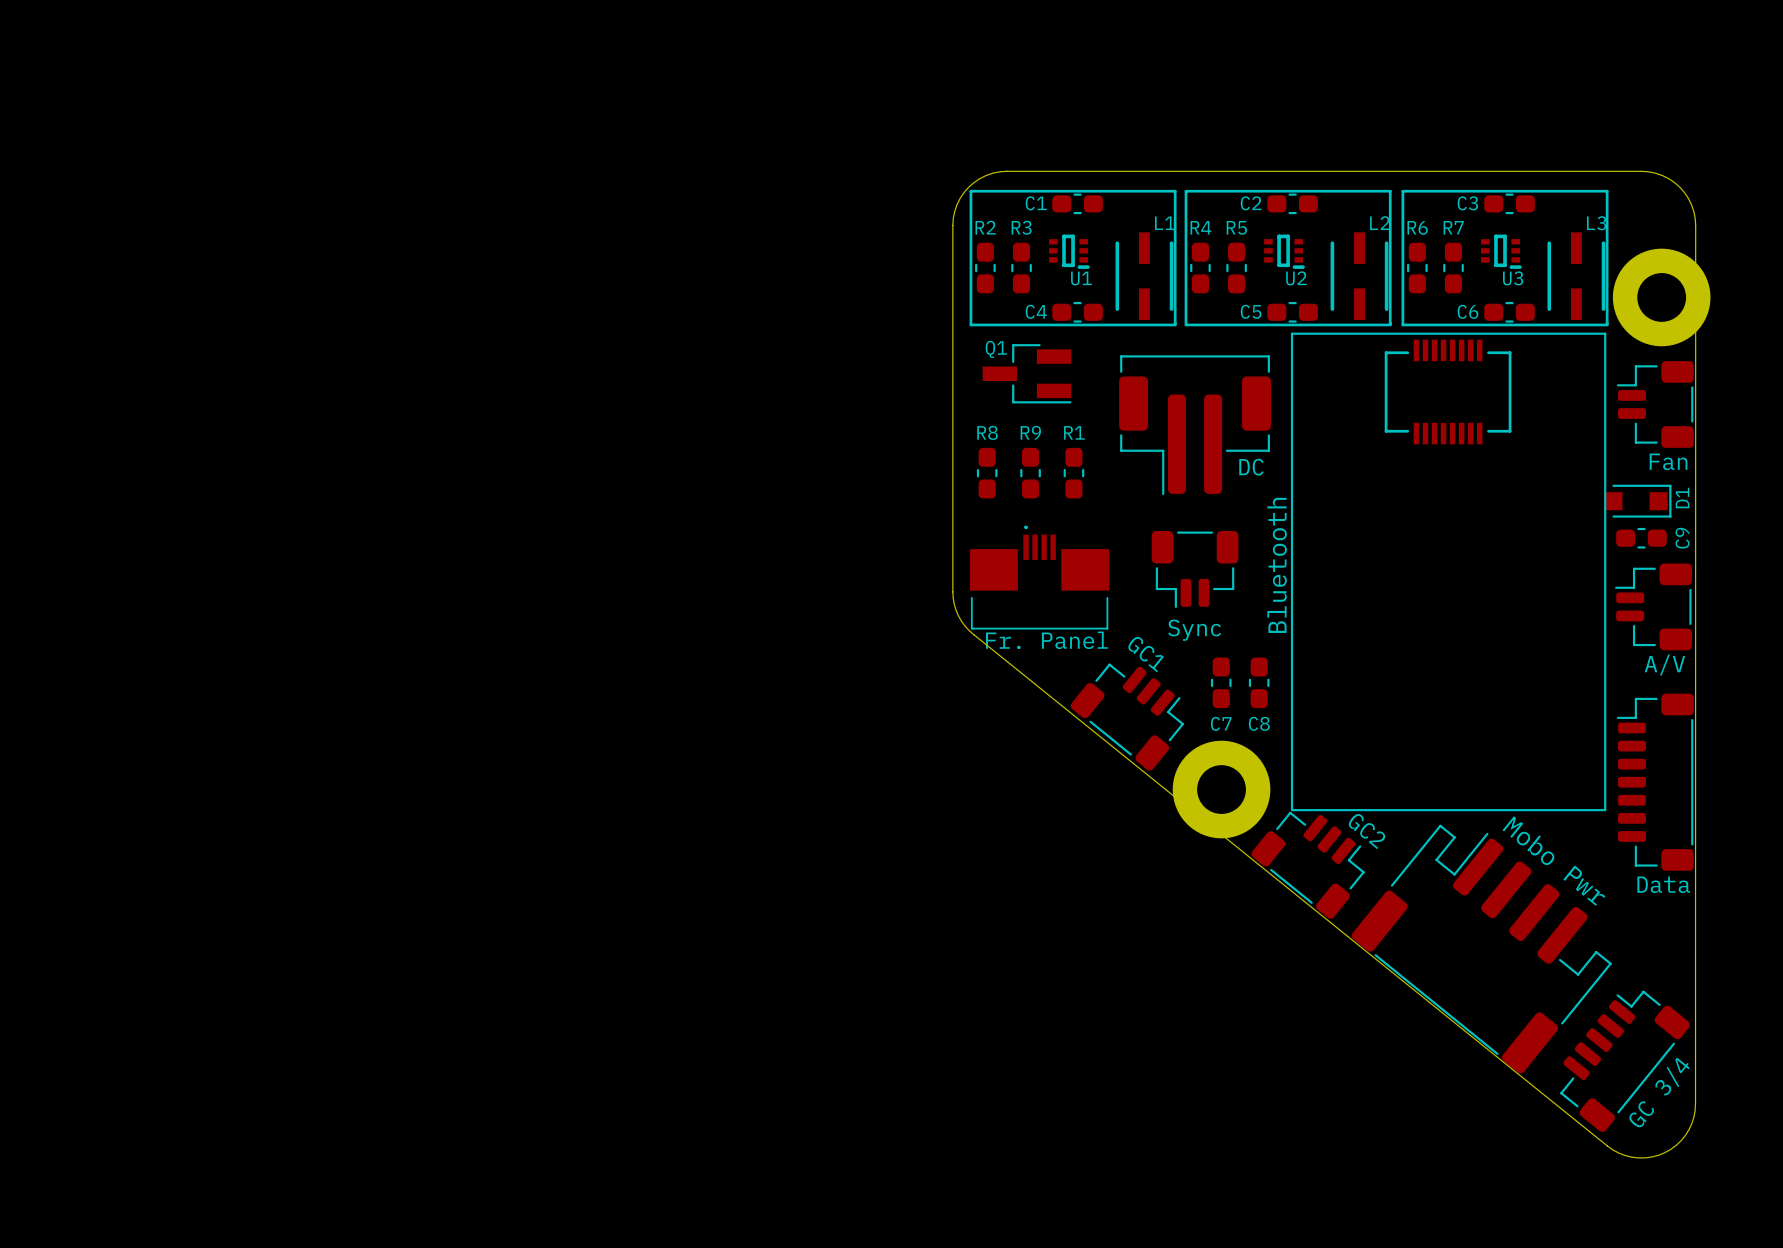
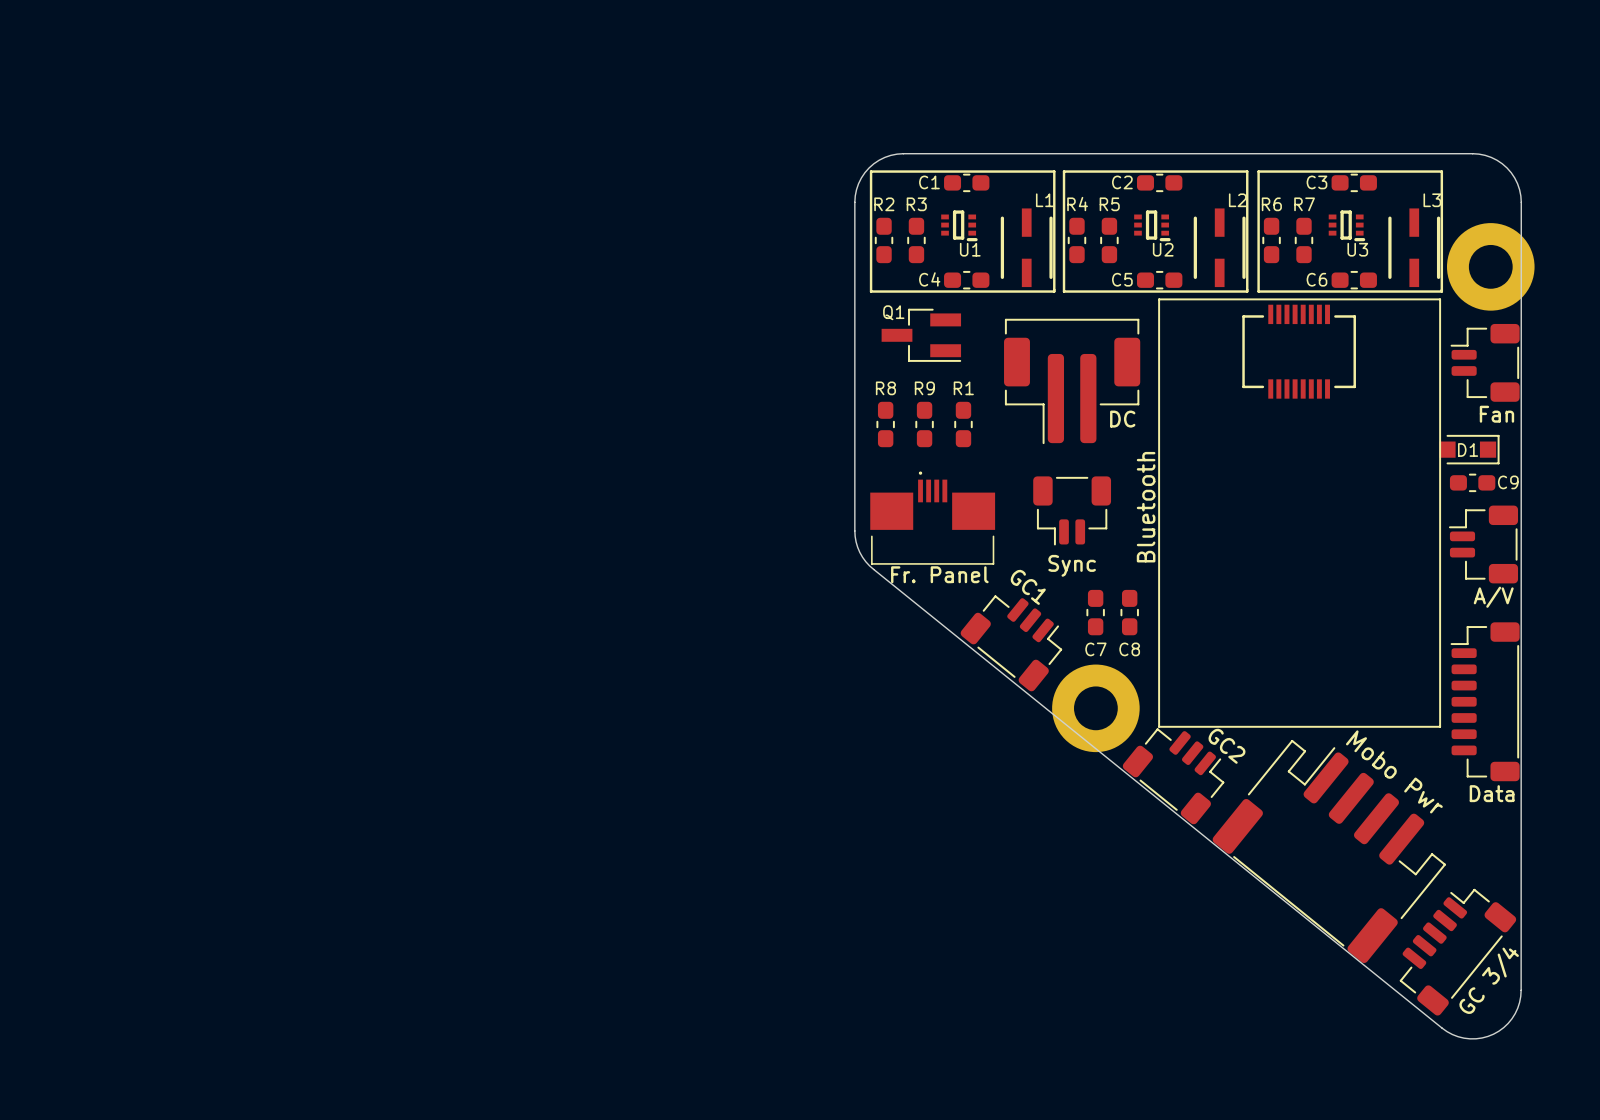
D1 name rotation: 0° (1682, 498) -> 90° clockwise (1468, 449)
D1 name position: D1 (1682, 498) -> D1 (1468, 449)
C9 name rotation: 0° (1682, 538) -> 90° clockwise (1508, 482)

